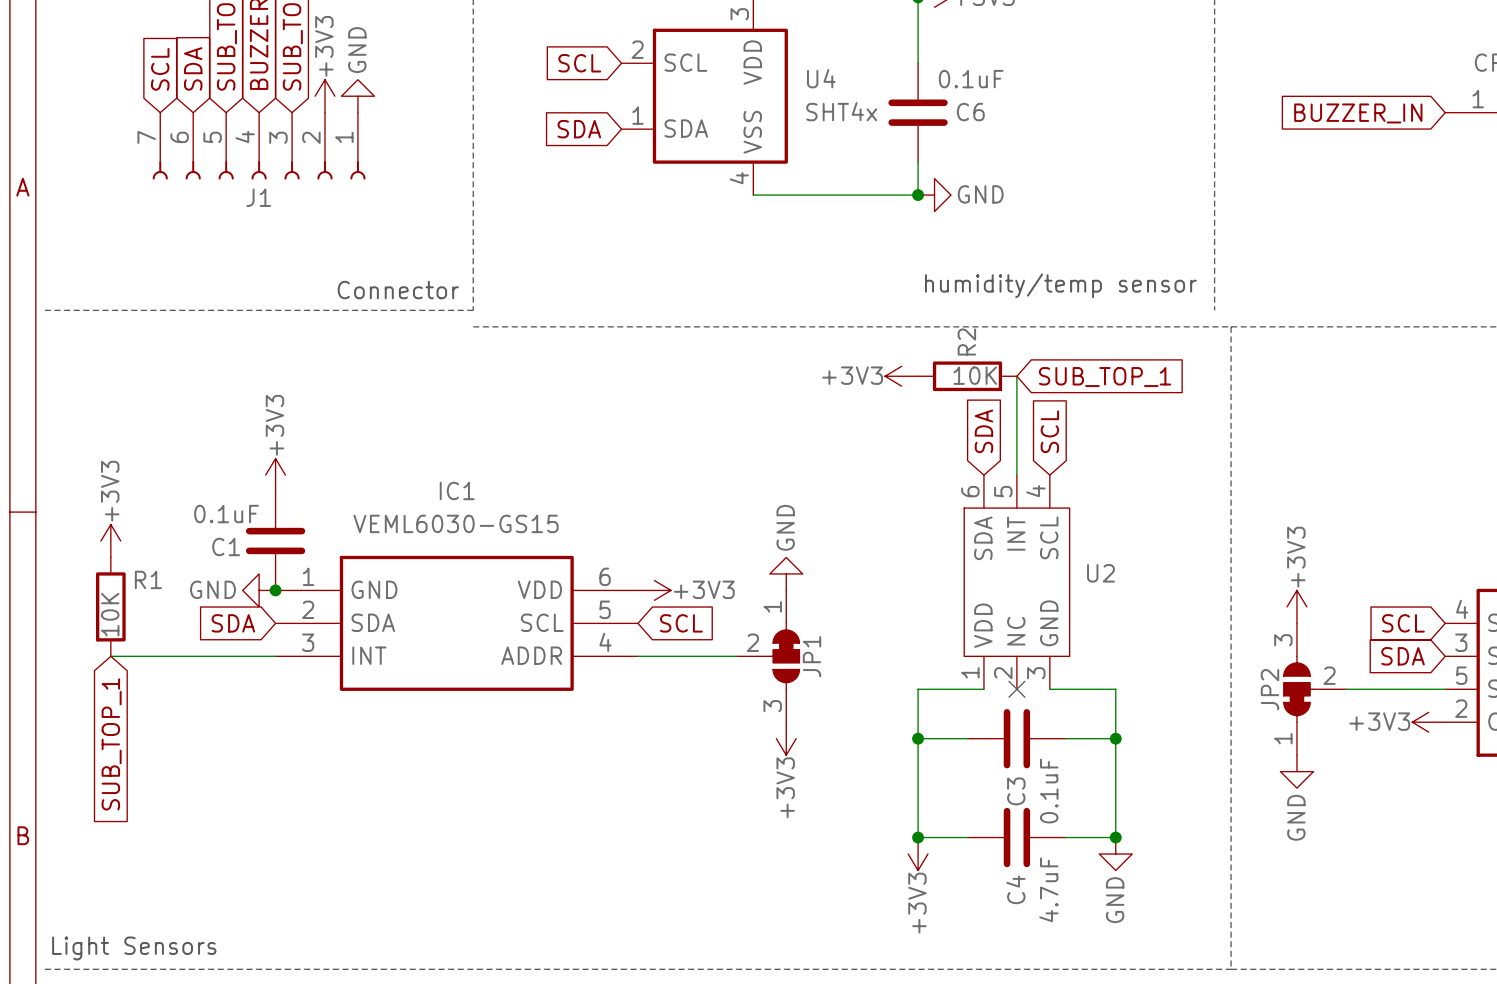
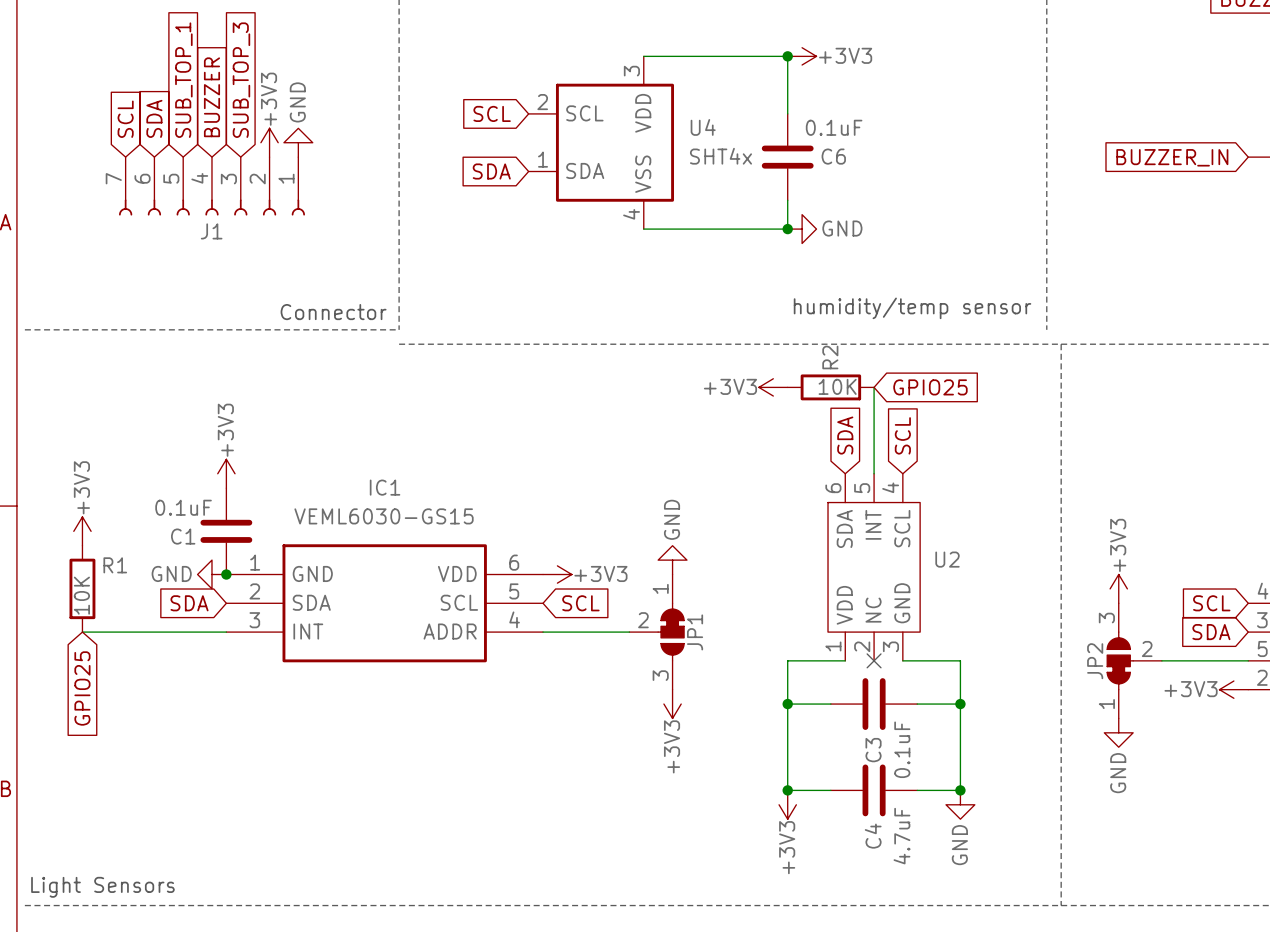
global label: SUB_TOP_1 (1104, 377) -> GPIO25 (930, 387)
global label: SUB_TOP_1 (111, 744) -> GPIO25 (82, 688)

